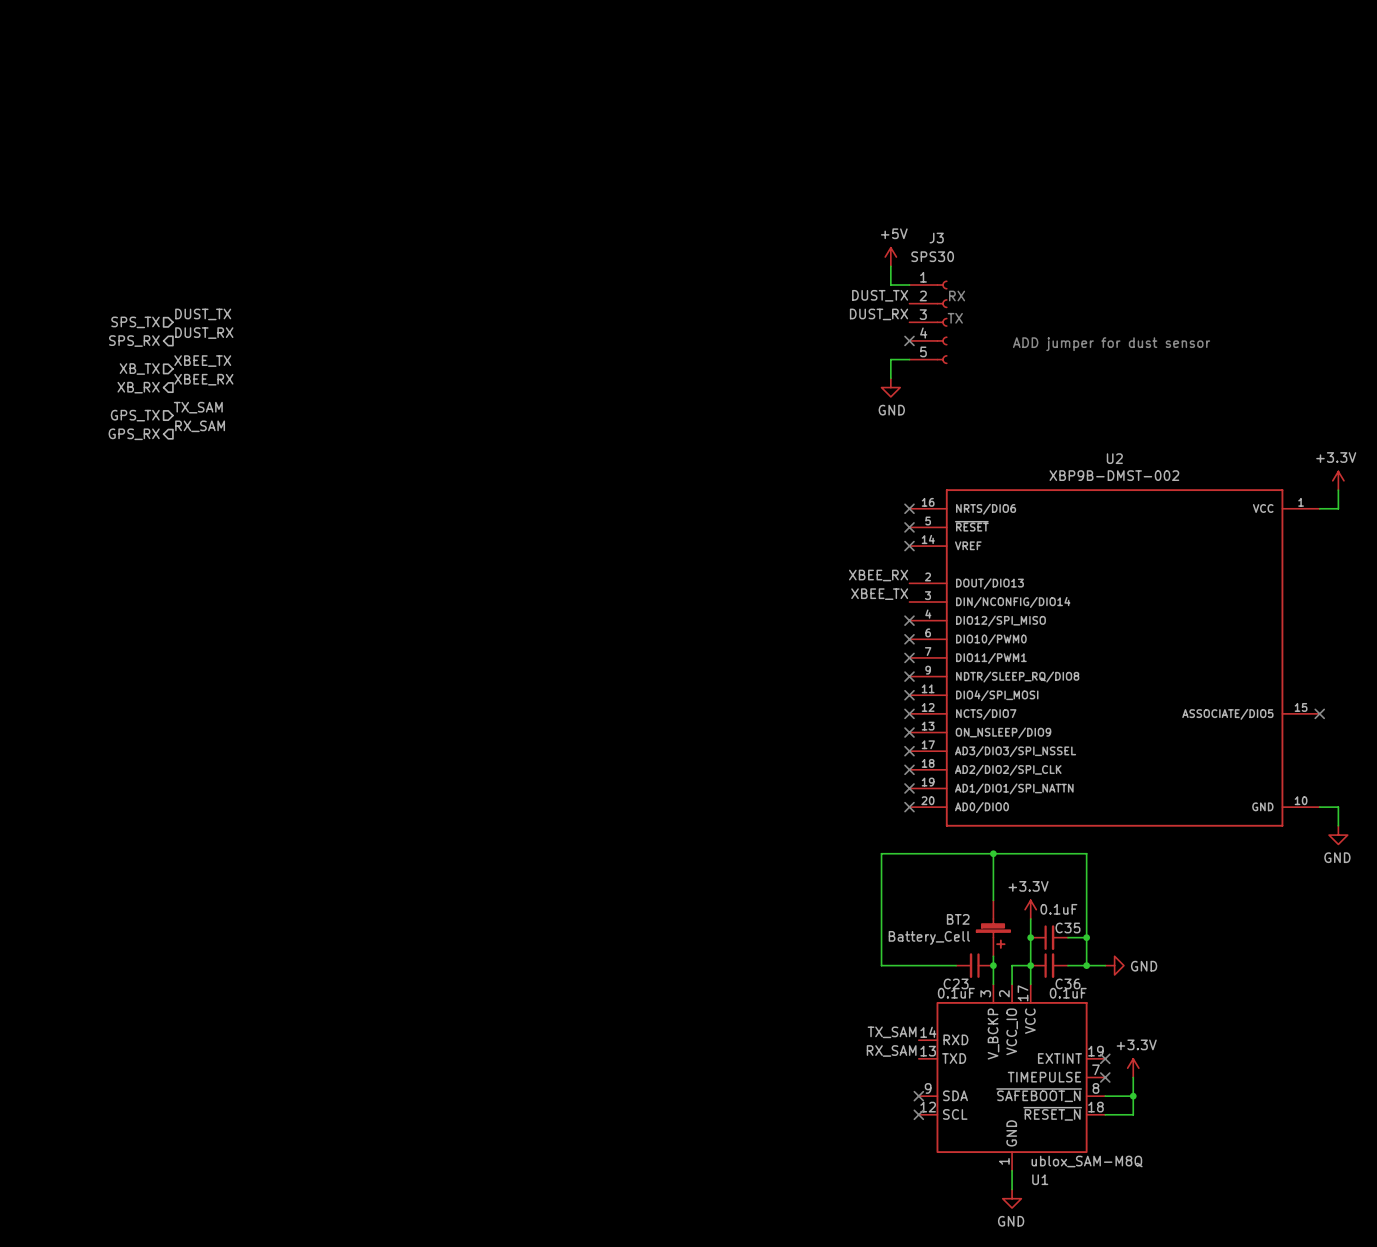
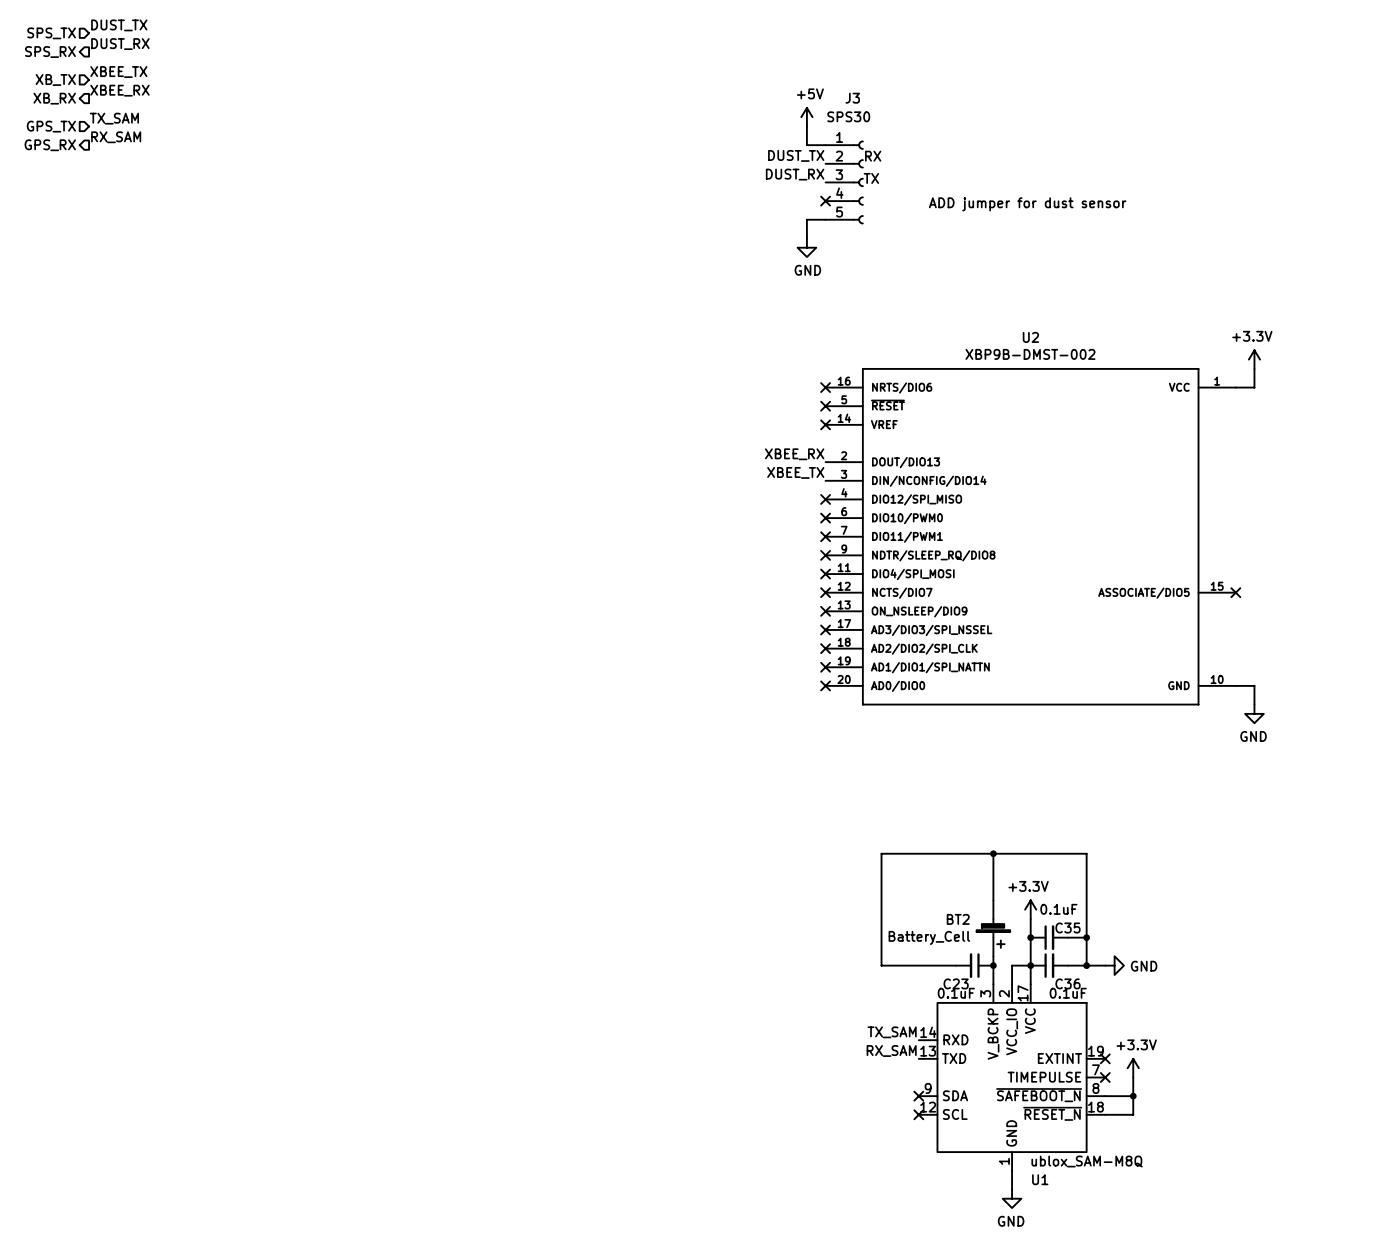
label: none -> DUST_TX (119, 25)
hierarchical label: none -> SPS_TX (51, 33)
label: none -> DUST_RX (120, 44)
hierarchical label: none -> SPS_RX (50, 52)
label: none -> XBEE_TX (118, 72)
hierarchical label: none -> XB_TX (55, 79)
label: none -> XBEE_RX (119, 90)
hierarchical label: none -> XB_RX (54, 98)
label: none -> TX_SAM (114, 118)
hierarchical label: none -> GPS_TX (51, 126)
label: none -> RX_SAM (116, 137)
hierarchical label: none -> GPS_RX (50, 145)
no-connect mark: none -> (825, 201)
power symbol position: +5V (890, 257) -> +5V (806, 117)
wire: (890, 266) (890, 285) (909, 285) -> (806, 126) (806, 145) (825, 145)
label position: DUST_TX (880, 295) -> DUST_TX (796, 155)
text position: RX (957, 296) -> RX (873, 156)
label: DUST_TX (203, 314) -> none
label position: DUST_RX (879, 314) -> DUST_RX (795, 174)
text position: TX (955, 318) -> TX (871, 178)
hierarchical label: SPS_TX (135, 322) -> none
J3 position: (928, 322) -> (844, 182)
label: DUST_RX (204, 333) -> none
no-connect mark: (909, 340) -> none
hierarchical label: SPS_RX (134, 341) -> none
text position: ADD jumper for dust sensor (1111, 344) -> ADD jumper for dust sensor (1027, 204)
wire: (909, 359) (890, 359) (890, 378) -> (825, 219) (806, 219) (806, 238)
label: XBEE_TX (202, 361) -> none
hierarchical label: XB_TX (139, 369) -> none
label: XBEE_RX (203, 379) -> none
hierarchical label: XB_RX (138, 387) -> none
no-connect mark: none -> (825, 387)
power symbol position: GND (890, 387) -> GND (806, 247)
no-connect mark: none -> (825, 406)
label: TX_SAM (198, 407) -> none
hierarchical label: GPS_TX (135, 415) -> none
no-connect mark: none -> (825, 424)
label: RX_SAM (200, 426) -> none
hierarchical label: GPS_RX (134, 434) -> none
power symbol position: +3.3V (1338, 480) -> +3.3V (1254, 359)
wire: (1338, 490) (1338, 508) (1319, 508) -> (1254, 368) (1254, 387) (1235, 387)
no-connect mark: none -> (825, 499)
no-connect mark: (909, 508) -> none
no-connect mark: none -> (825, 518)
no-connect mark: (909, 527) -> none
no-connect mark: none -> (825, 536)
no-connect mark: (909, 546) -> none
no-connect mark: none -> (825, 555)
no-connect mark: none -> (825, 574)
label position: XBEE_RX (878, 575) -> XBEE_RX (794, 454)
no-connect mark: none -> (825, 592)
no-connect mark: none -> (1235, 592)
label position: XBEE_TX (879, 594) -> XBEE_TX (795, 472)
no-connect mark: none -> (825, 611)
no-connect mark: (909, 620) -> none
no-connect mark: none -> (825, 629)
no-connect mark: (909, 639) -> none
no-connect mark: none -> (825, 648)
no-connect mark: (909, 657) -> none
U2 position: (1114, 657) -> (1030, 536)
no-connect mark: none -> (825, 667)
no-connect mark: (909, 676) -> none
no-connect mark: none -> (825, 685)
no-connect mark: (909, 695) -> none
no-connect mark: (909, 713) -> none
no-connect mark: (1319, 713) -> none
no-connect mark: (909, 732) -> none
no-connect mark: (909, 751) -> none
no-connect mark: (909, 769) -> none
no-connect mark: (909, 788) -> none
no-connect mark: (909, 807) -> none
wire: (1319, 807) (1338, 807) (1338, 825) -> (1235, 685) (1254, 685) (1254, 704)
power symbol position: GND (1338, 835) -> GND (1254, 713)

